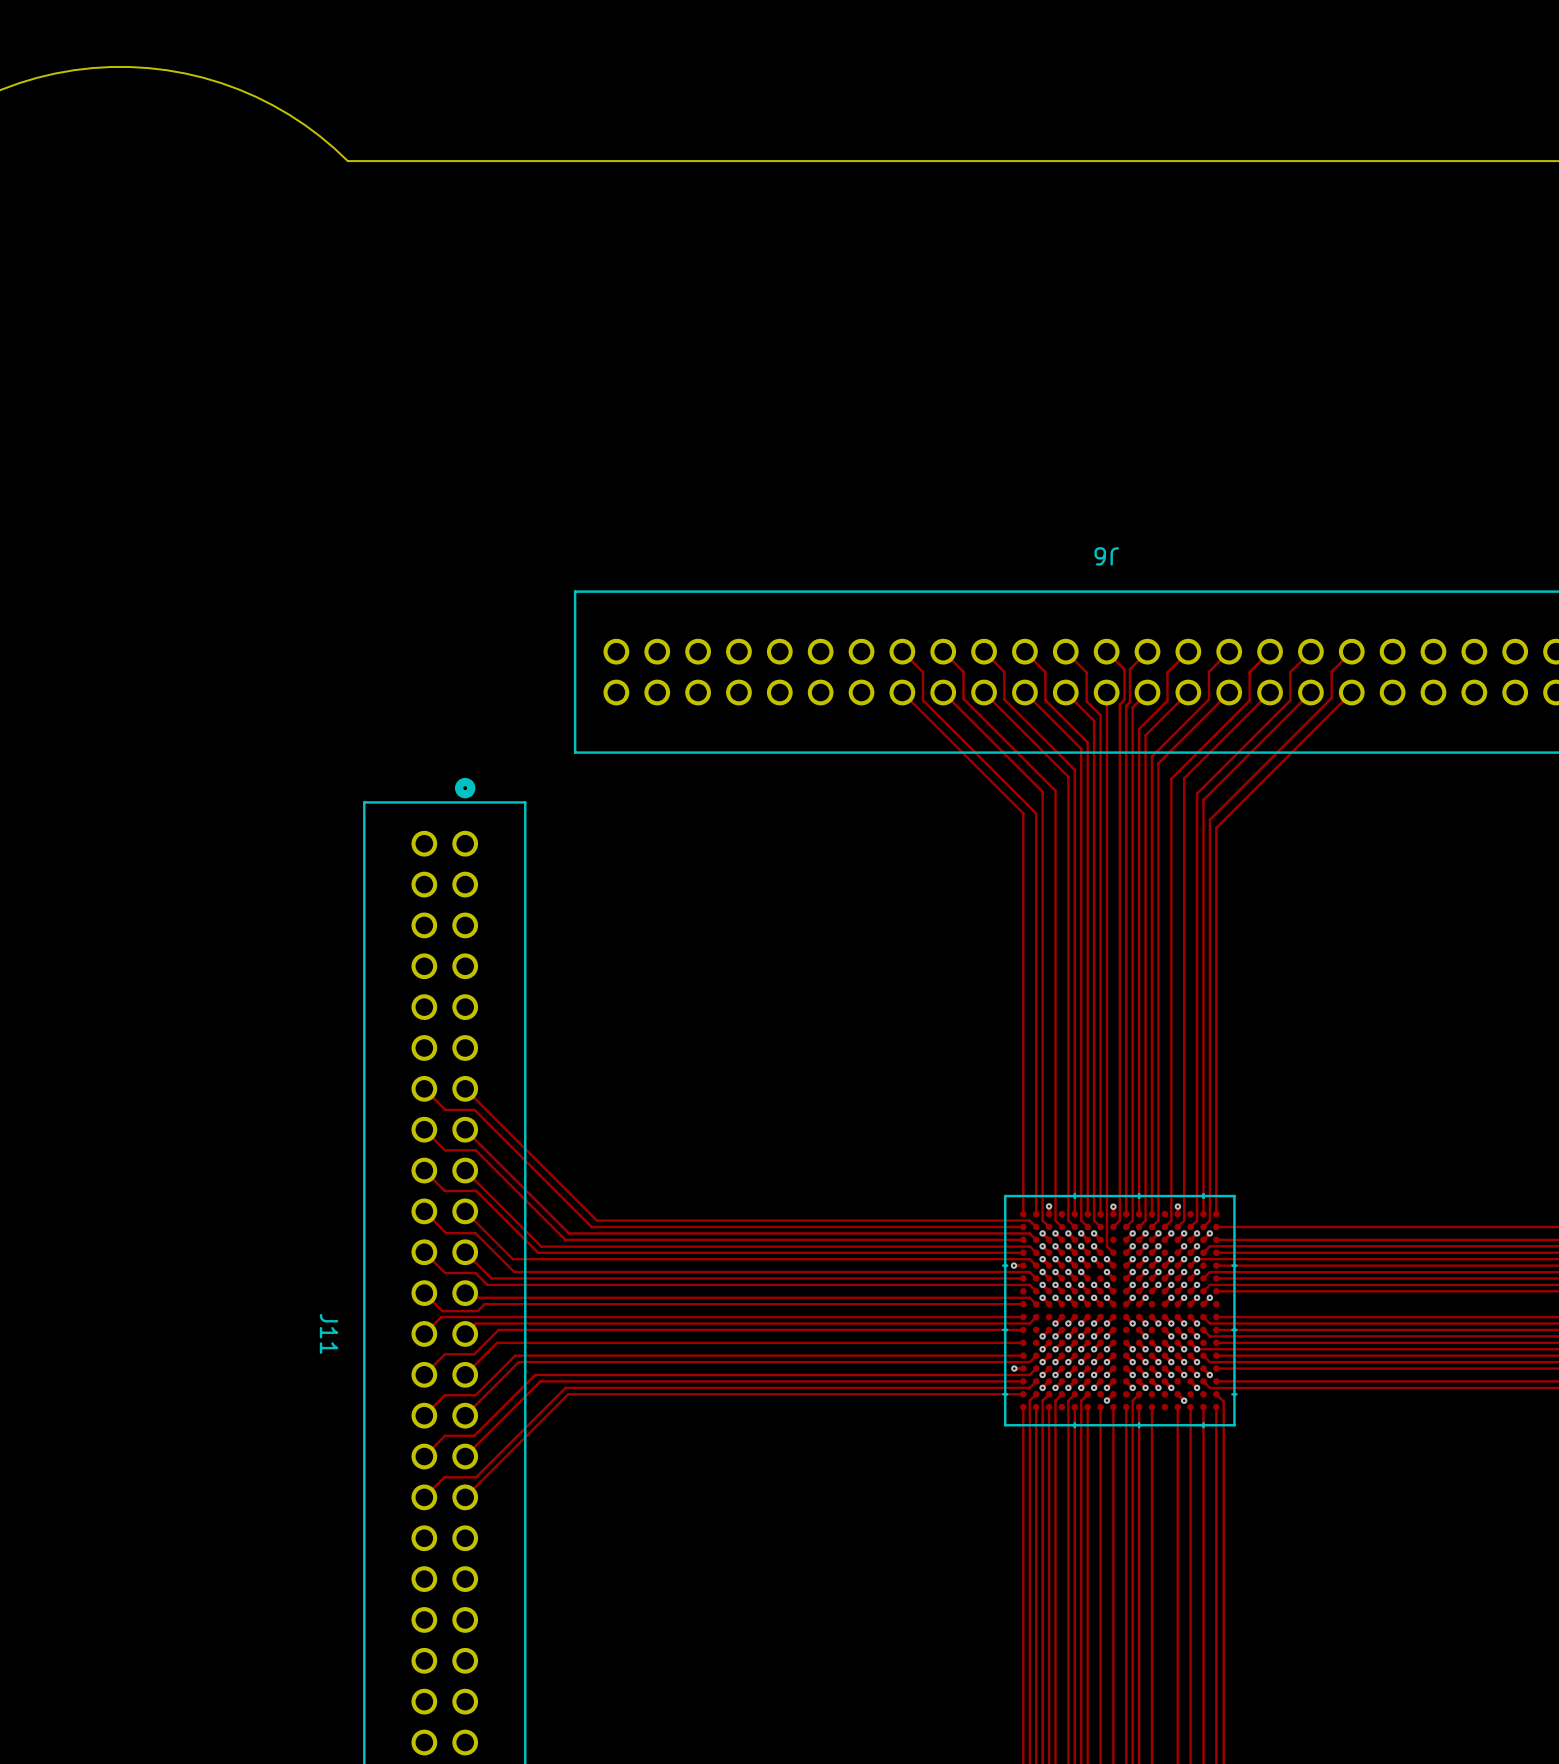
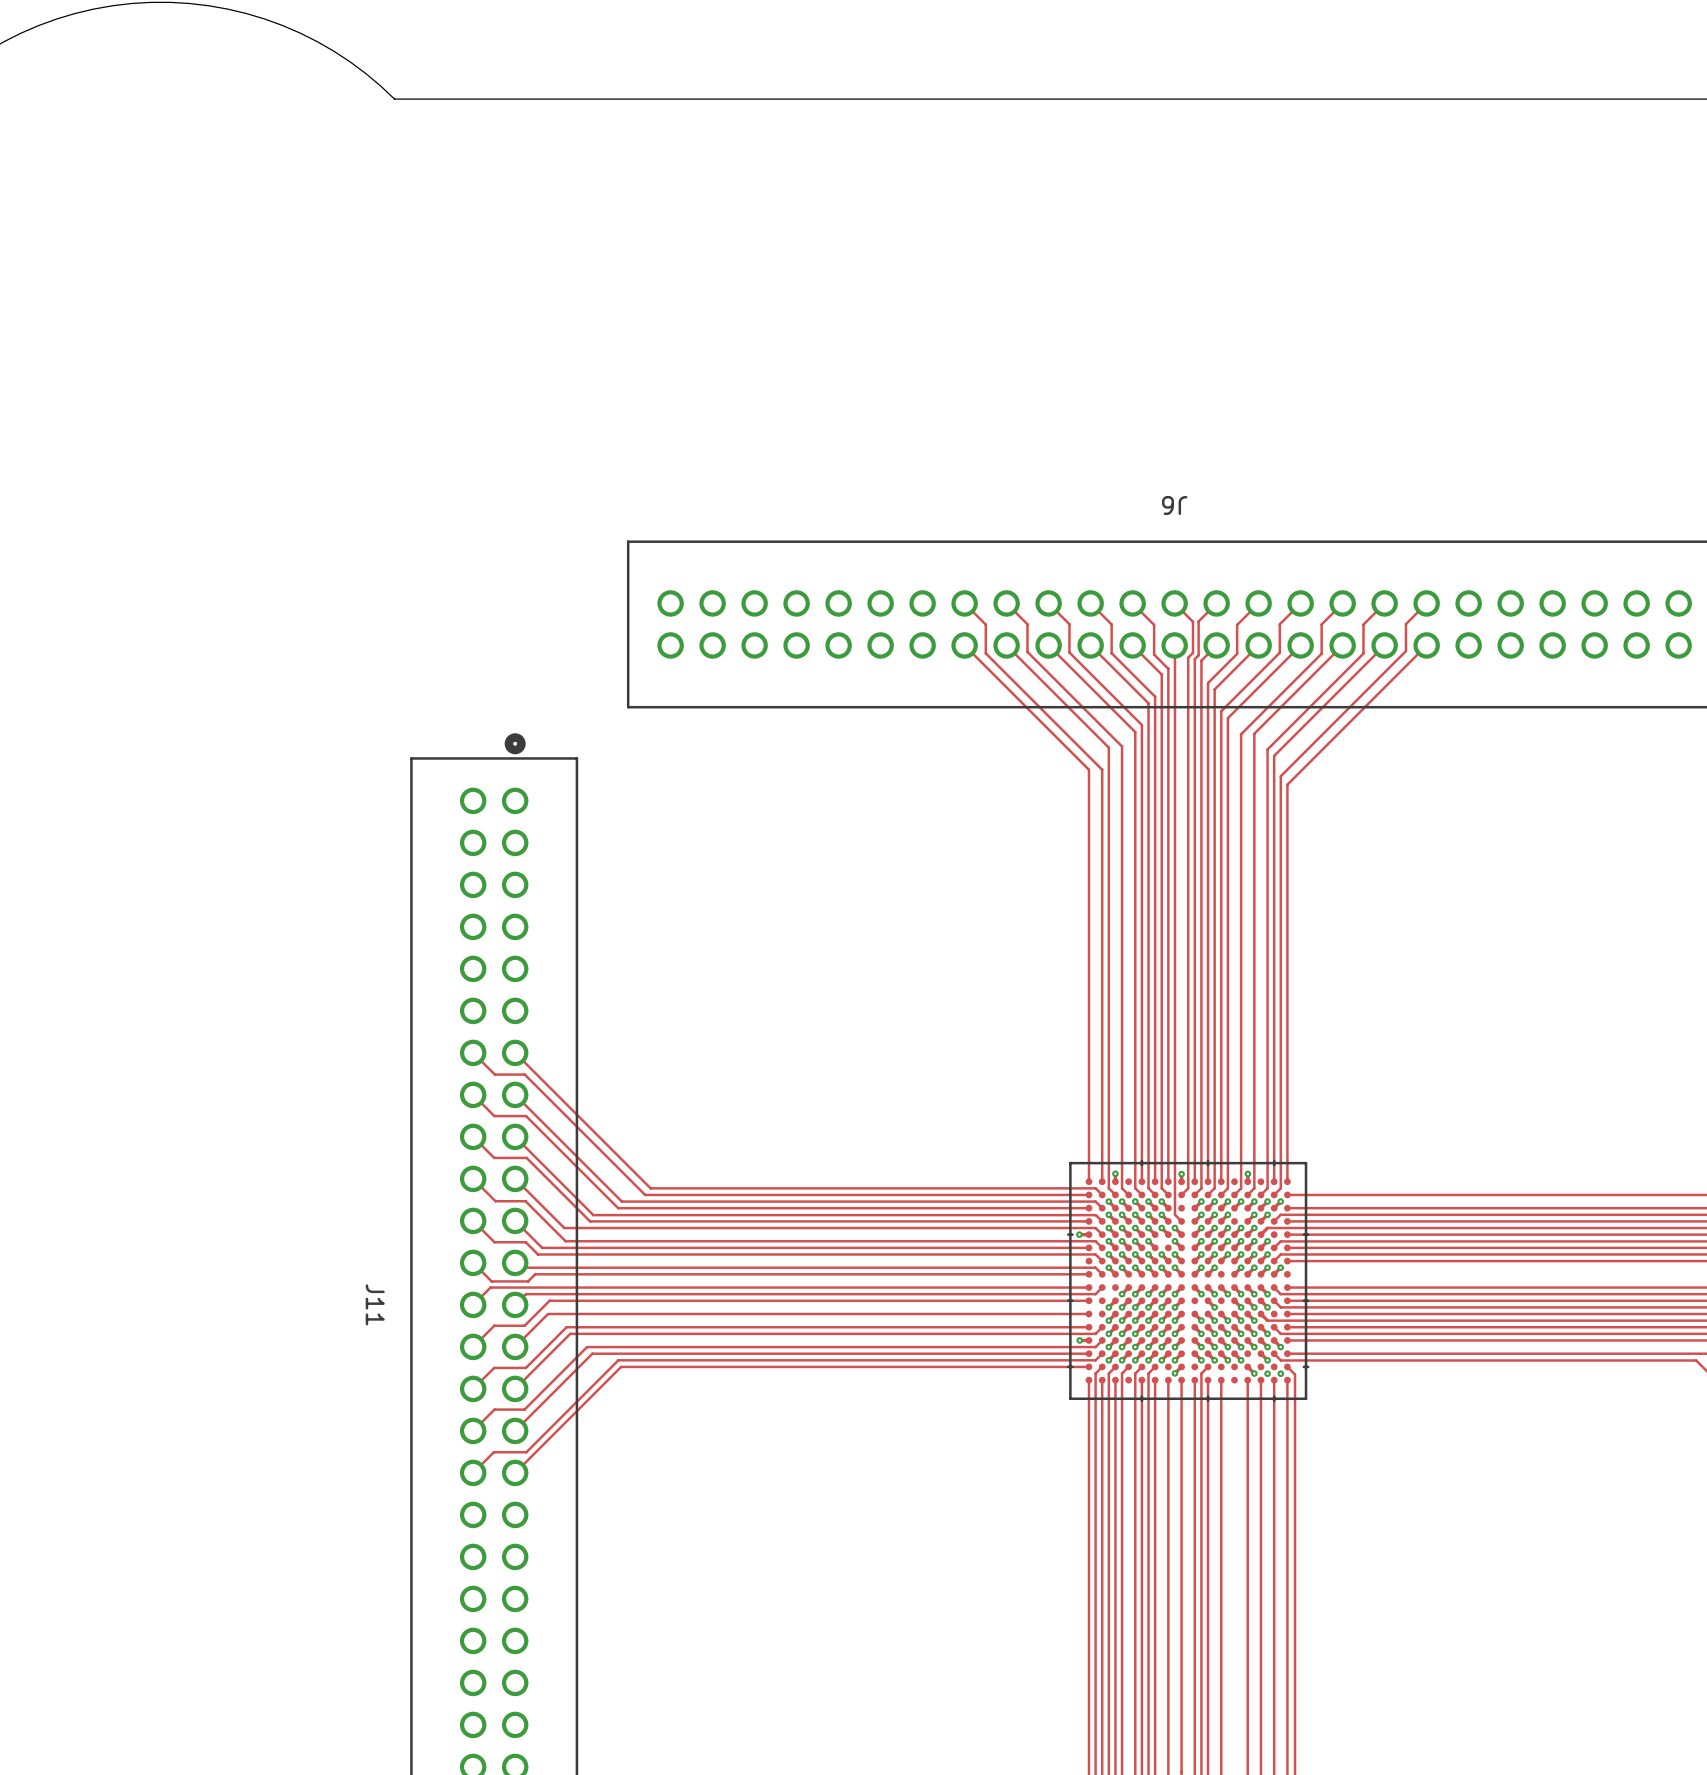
via: (1197, 1259) -> none
via: (1197, 1349) -> none
via: none -> (1267, 1373)
via: none -> (1280, 1373)

